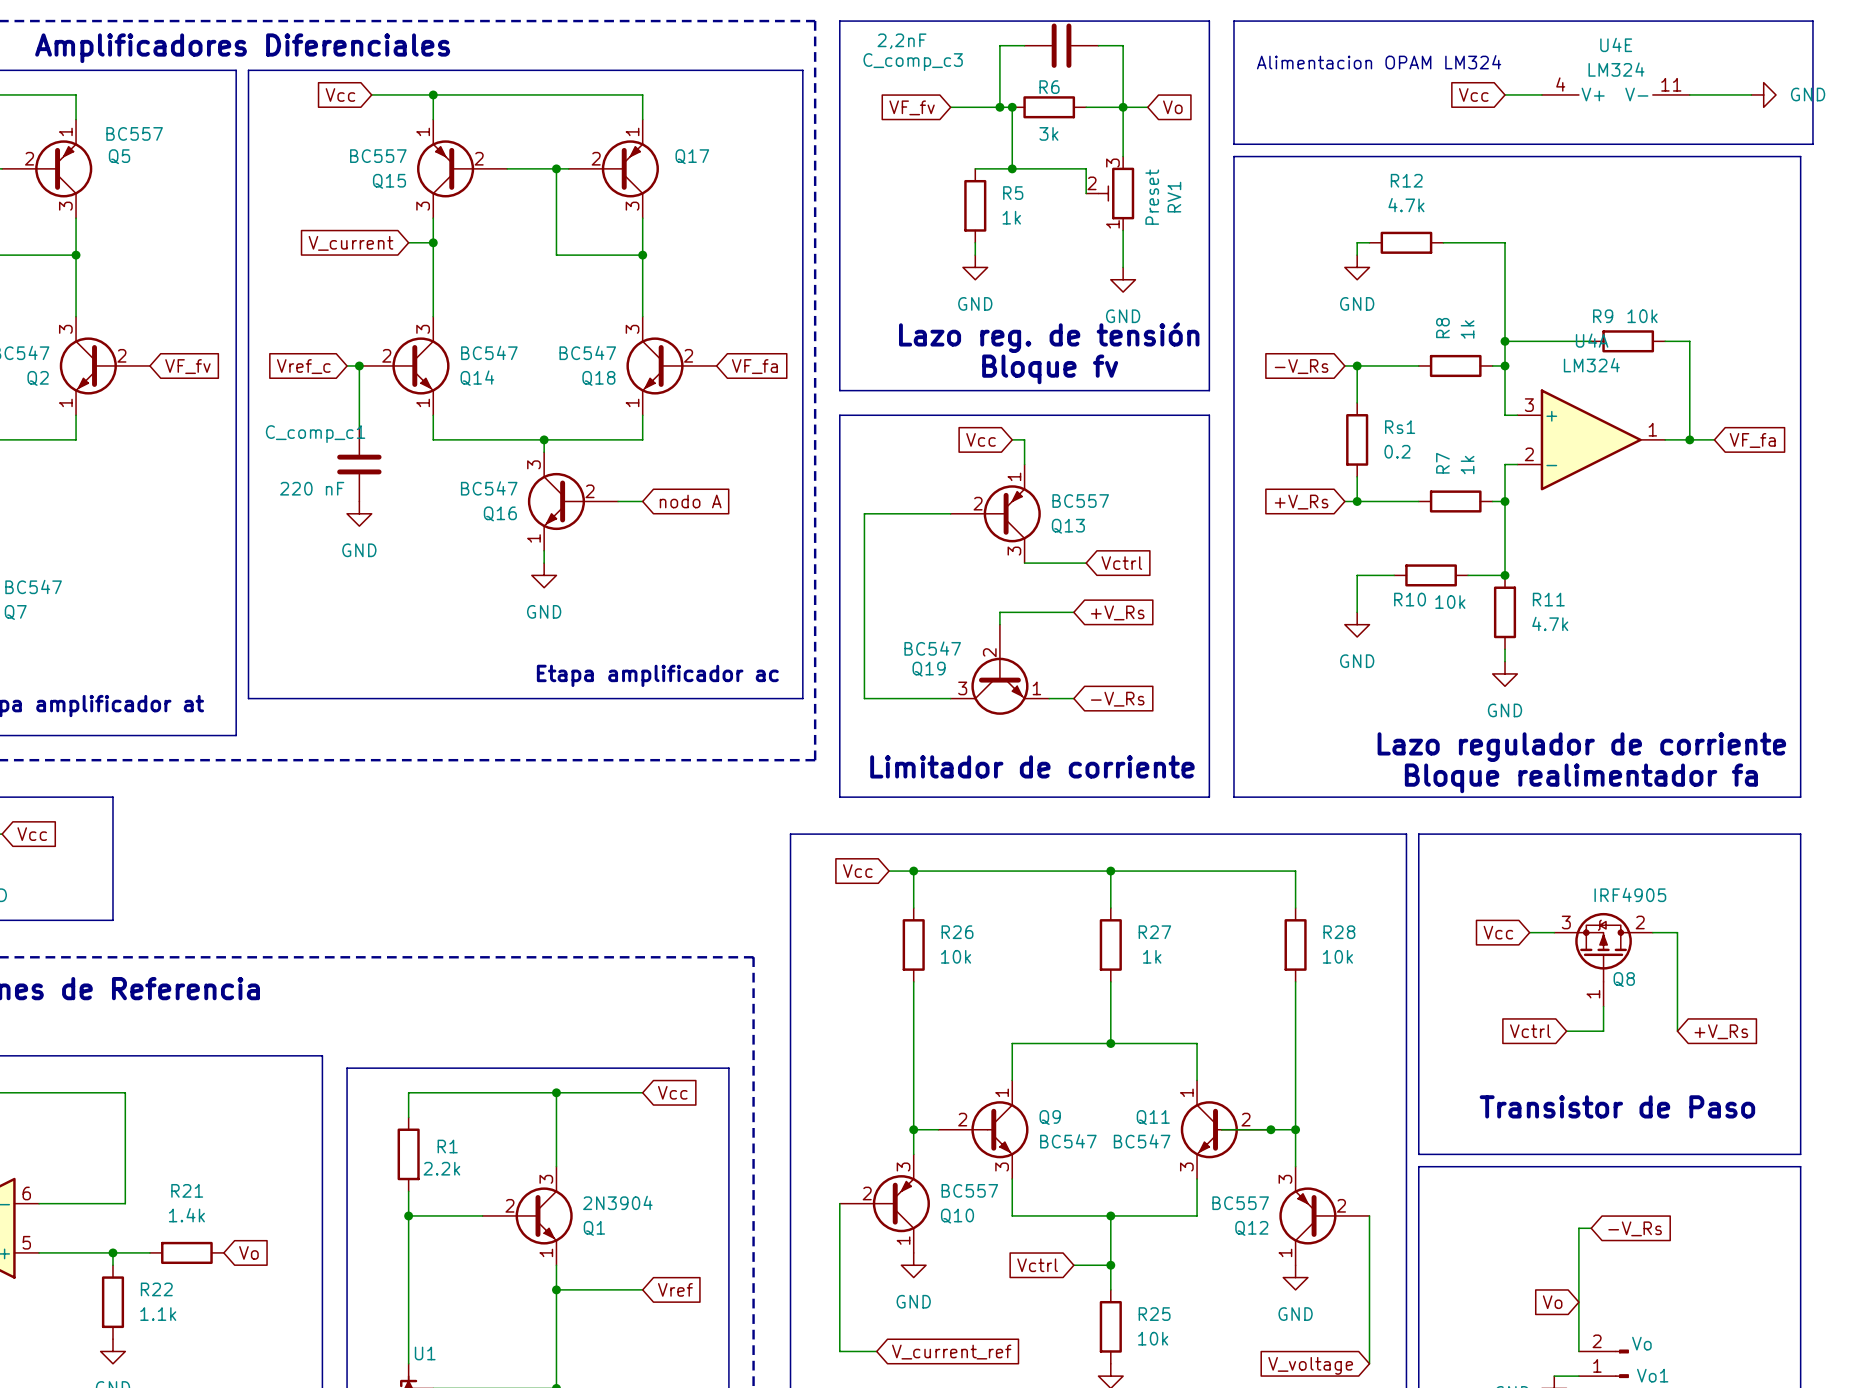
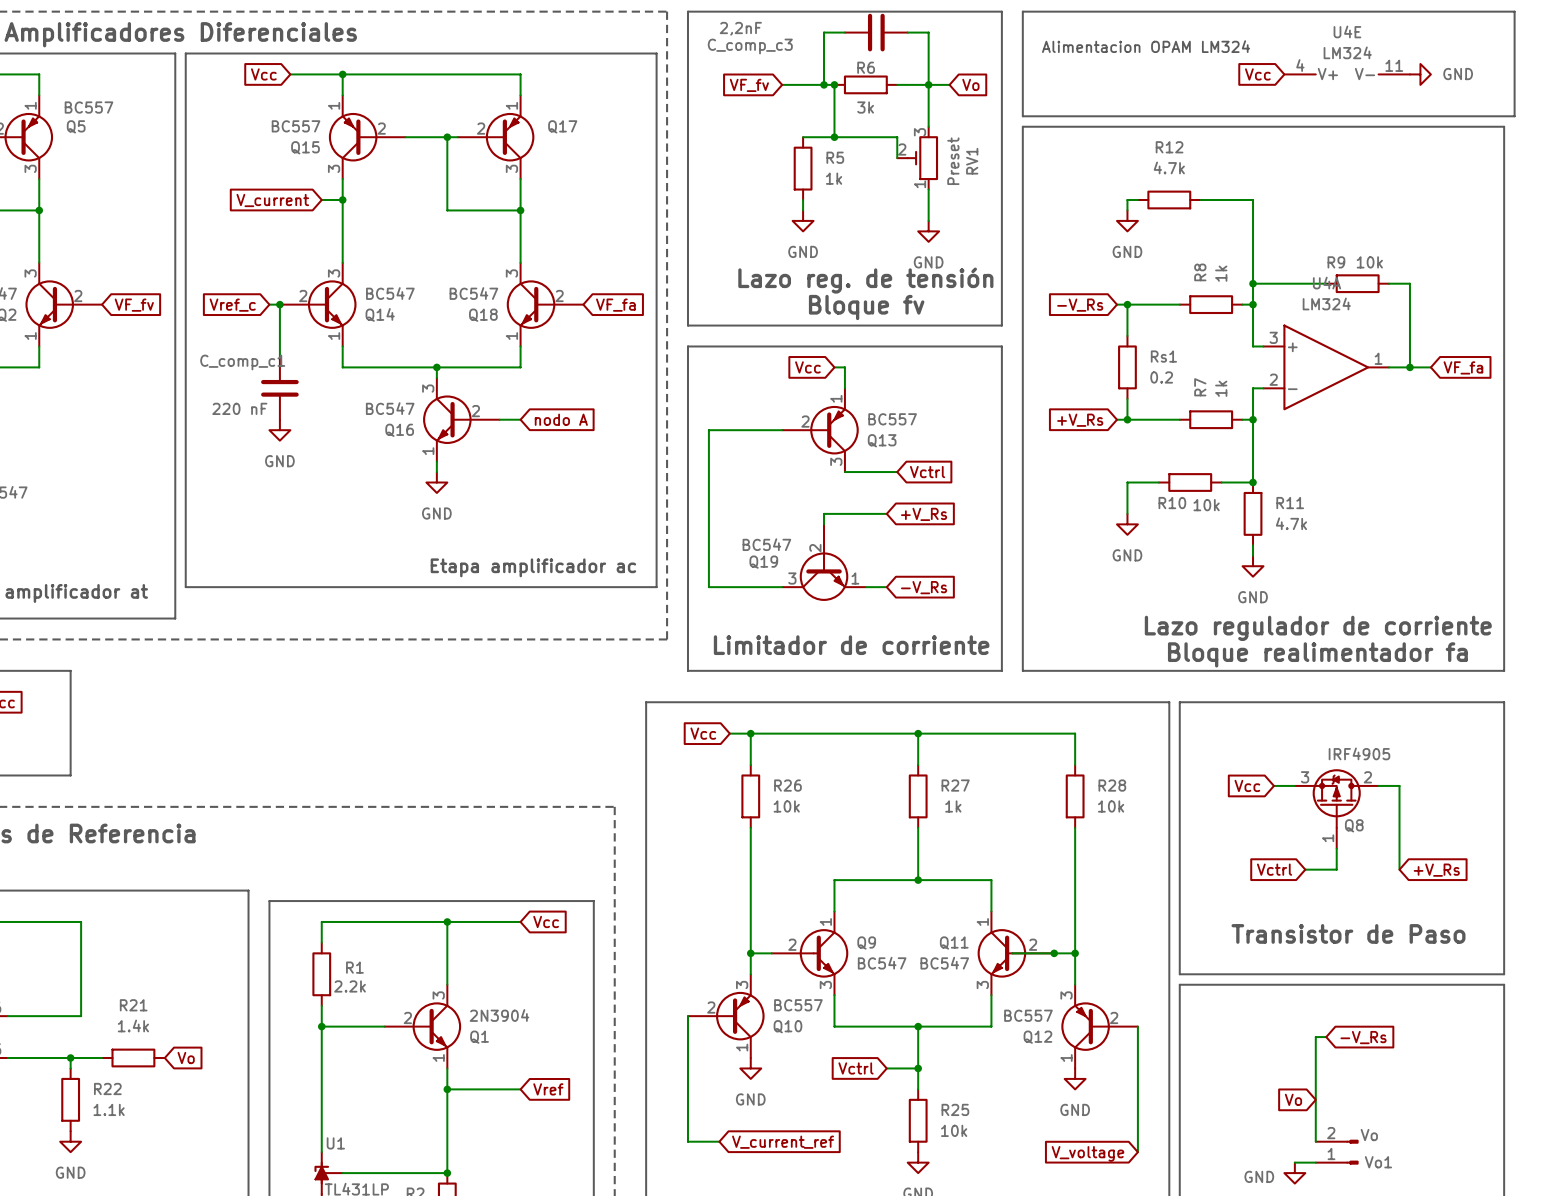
global label position: Vcc (1473, 94) -> Vcc (1257, 74)
wire: (1505, 94) (1541, 94) -> none
wire: (1689, 94) (1751, 94) -> none
power symbol position: GND (1763, 94) -> GND (1420, 74)

